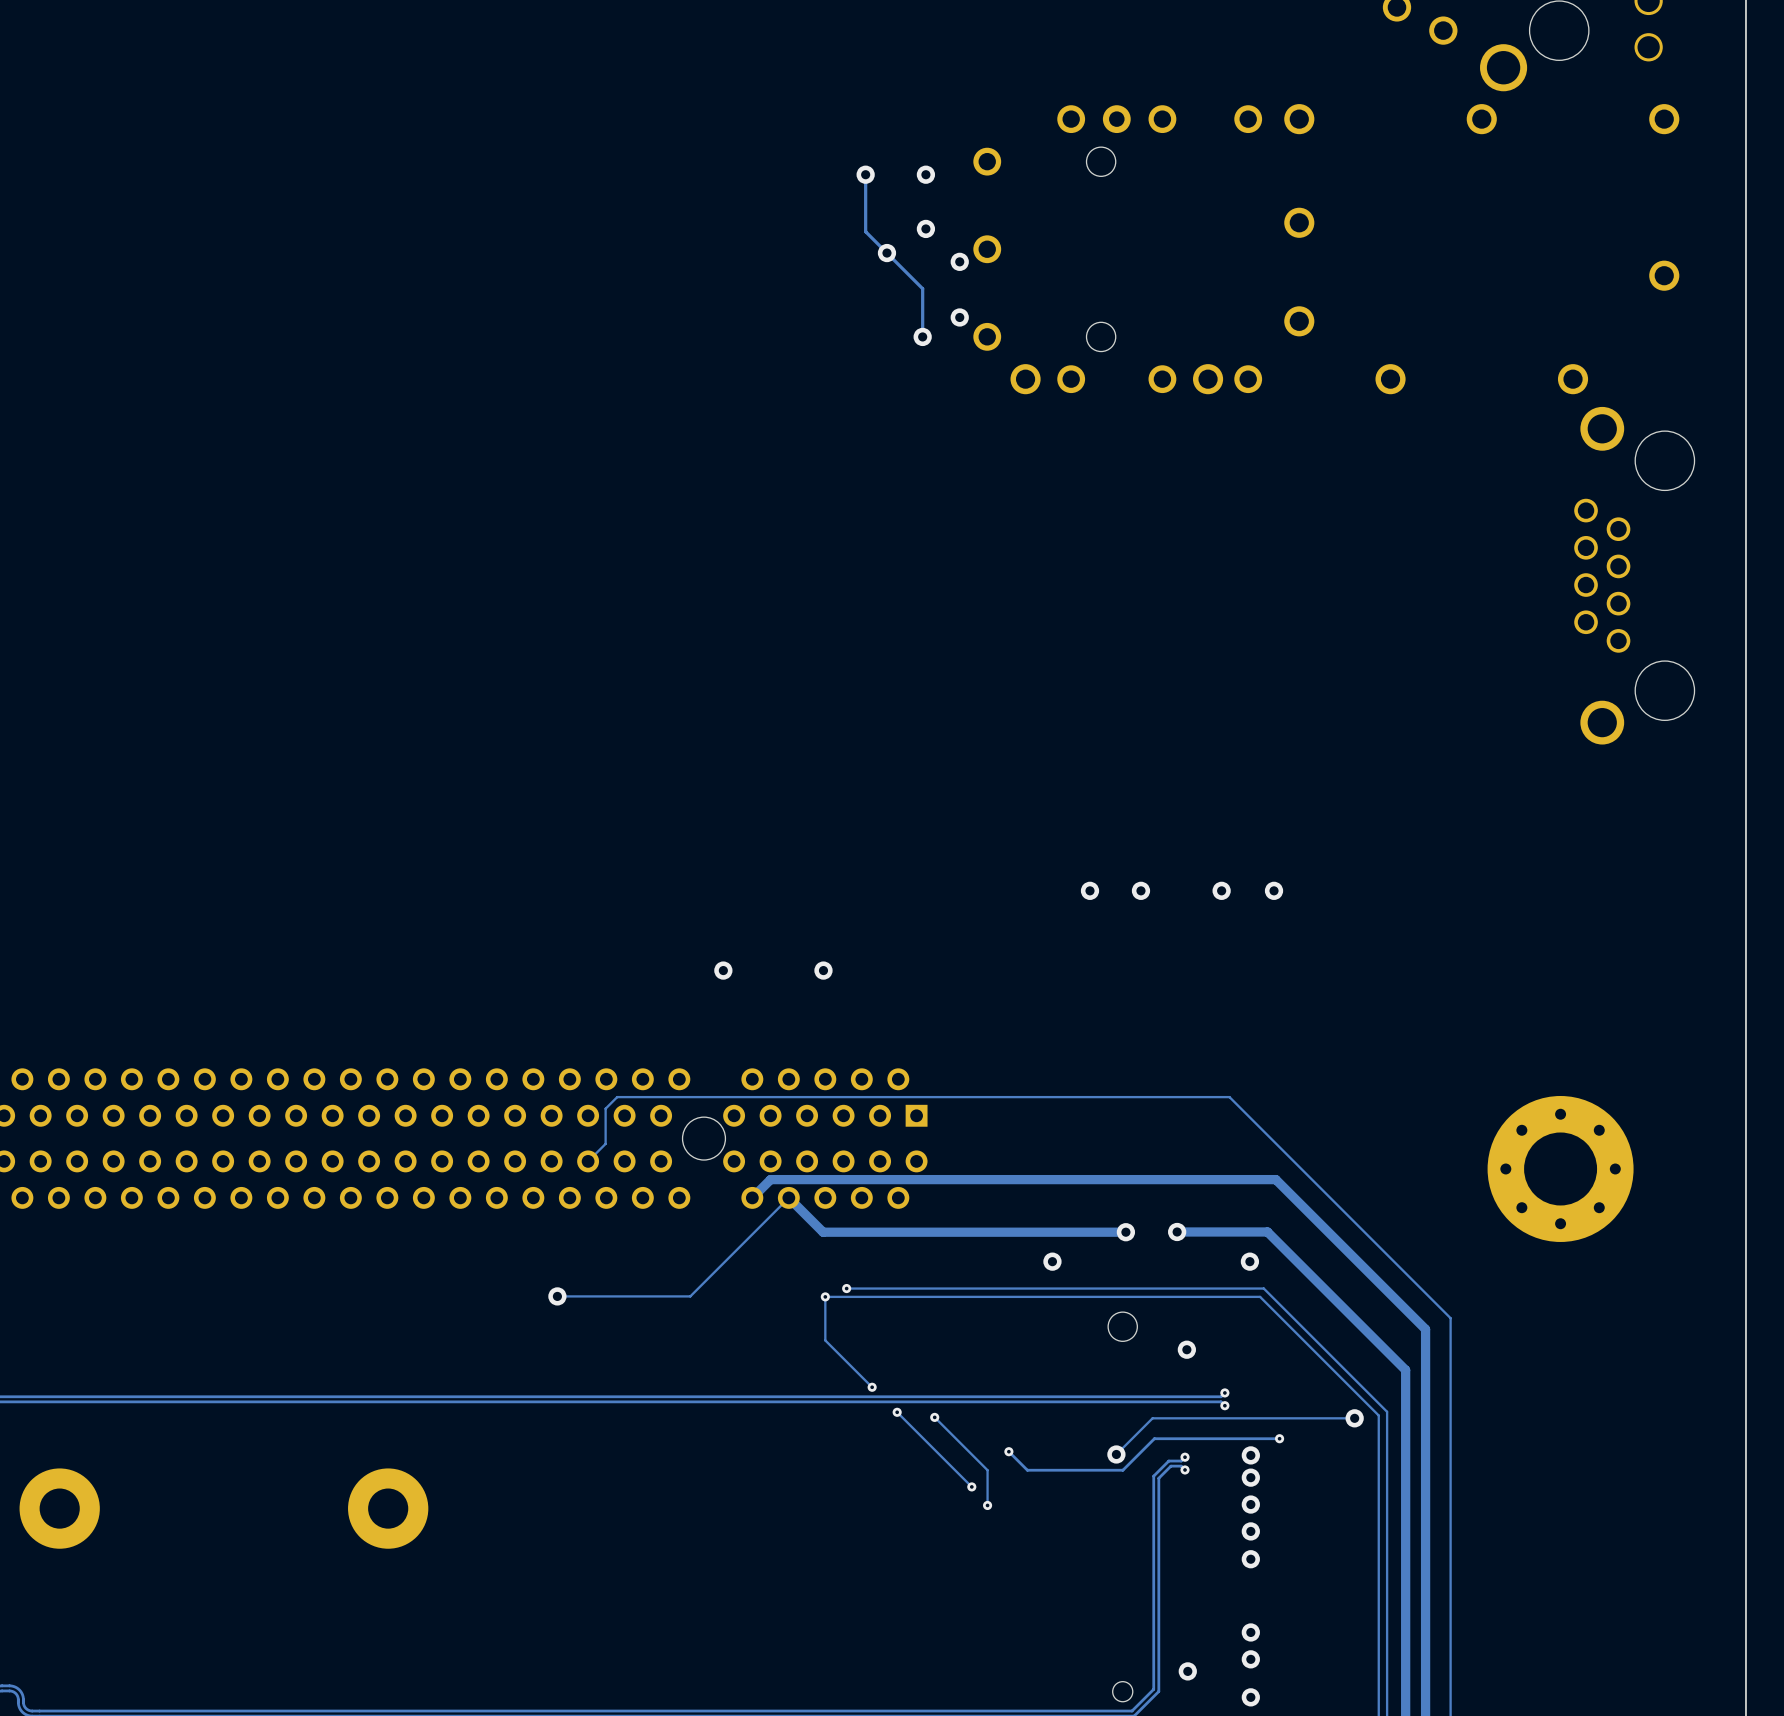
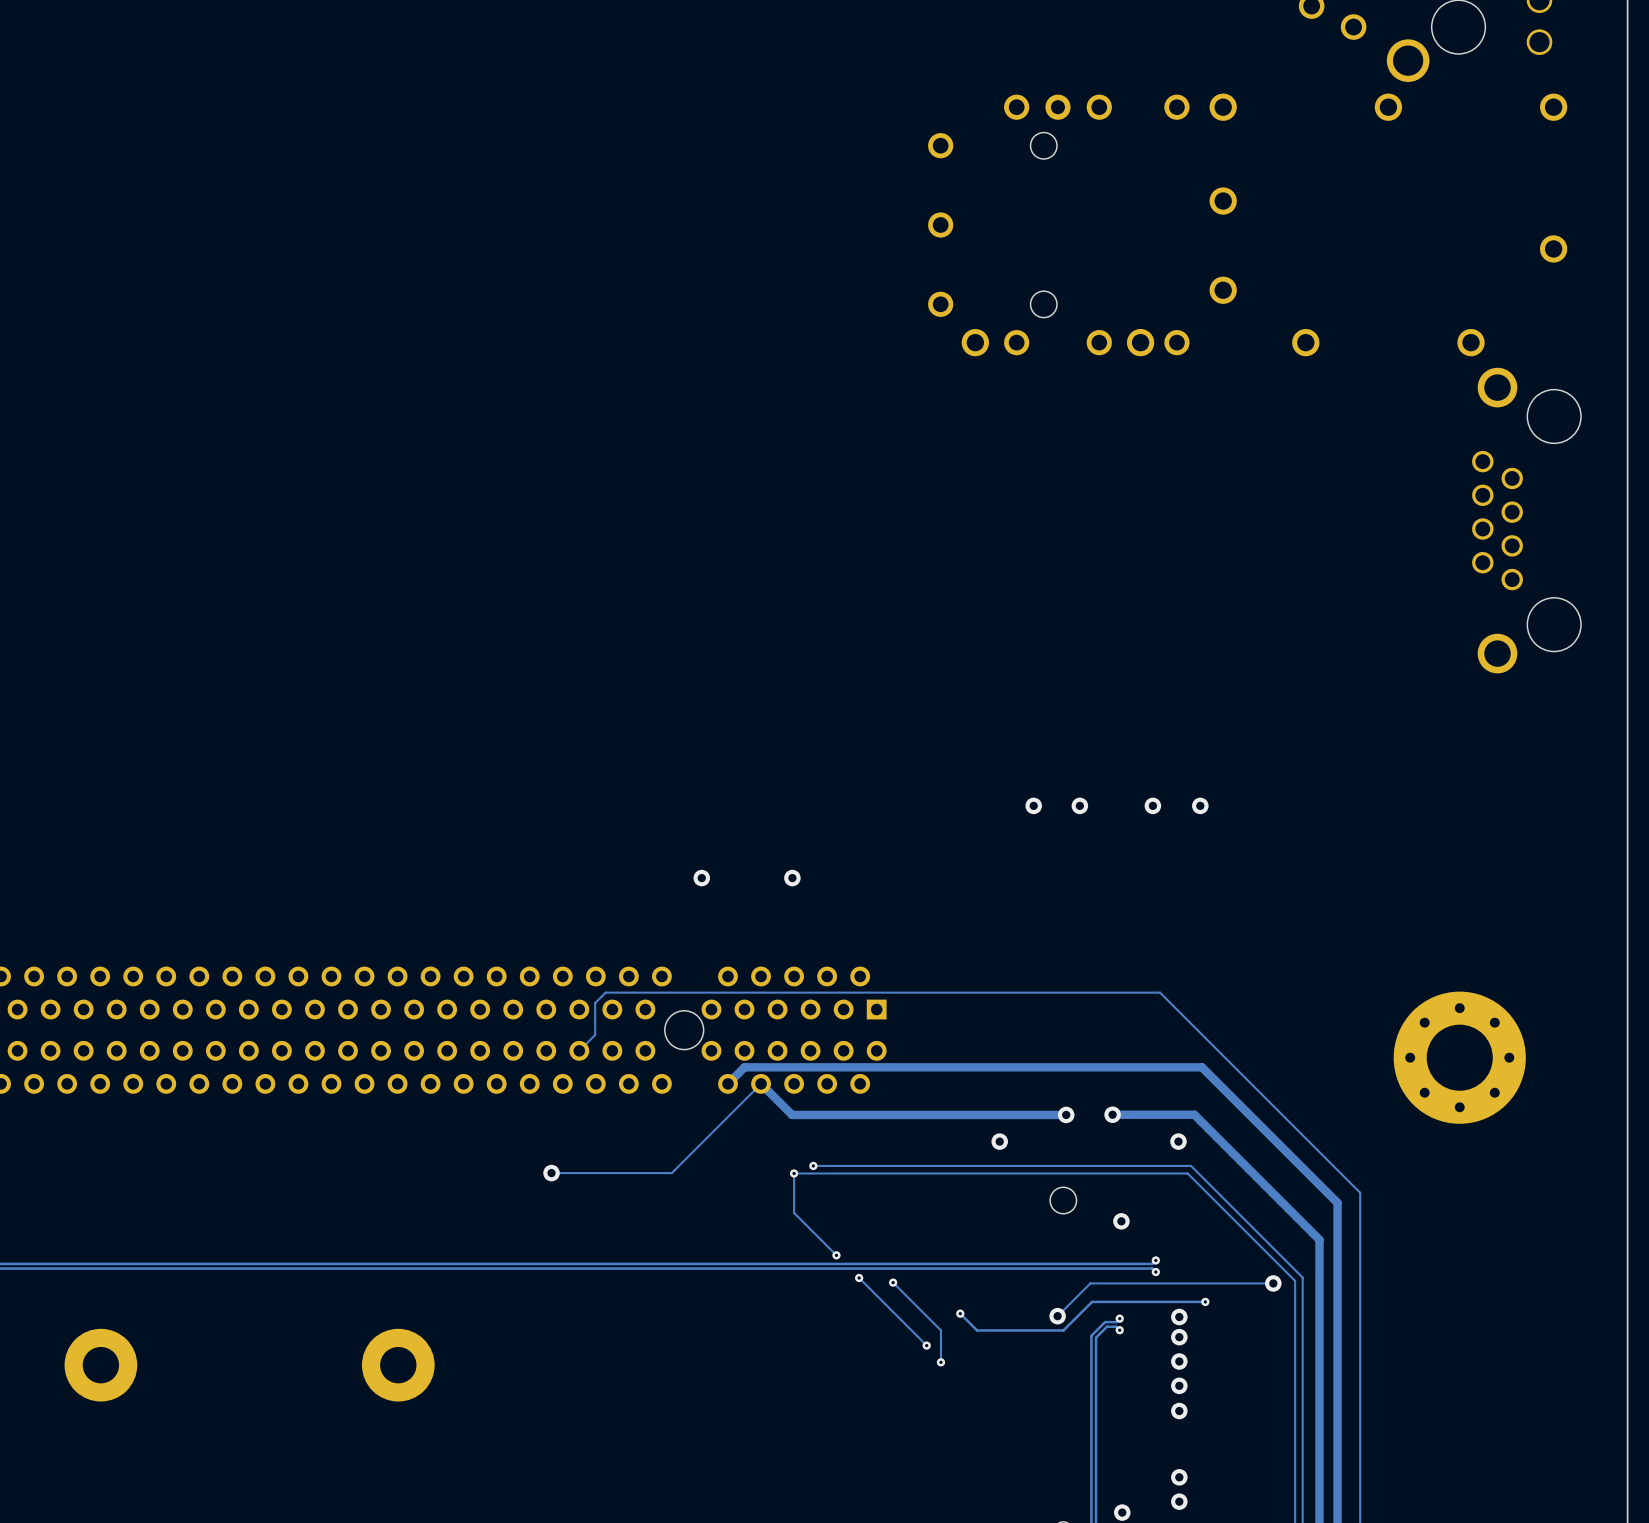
track: (865, 174) (865, 231) (922, 288) (922, 336) -> none
via: (865, 174) -> none
via: (925, 174) -> none
via: (925, 228) -> none
via: (886, 253) -> none
via: (959, 261) -> none
via: (959, 317) -> none
via: (922, 336) -> none

